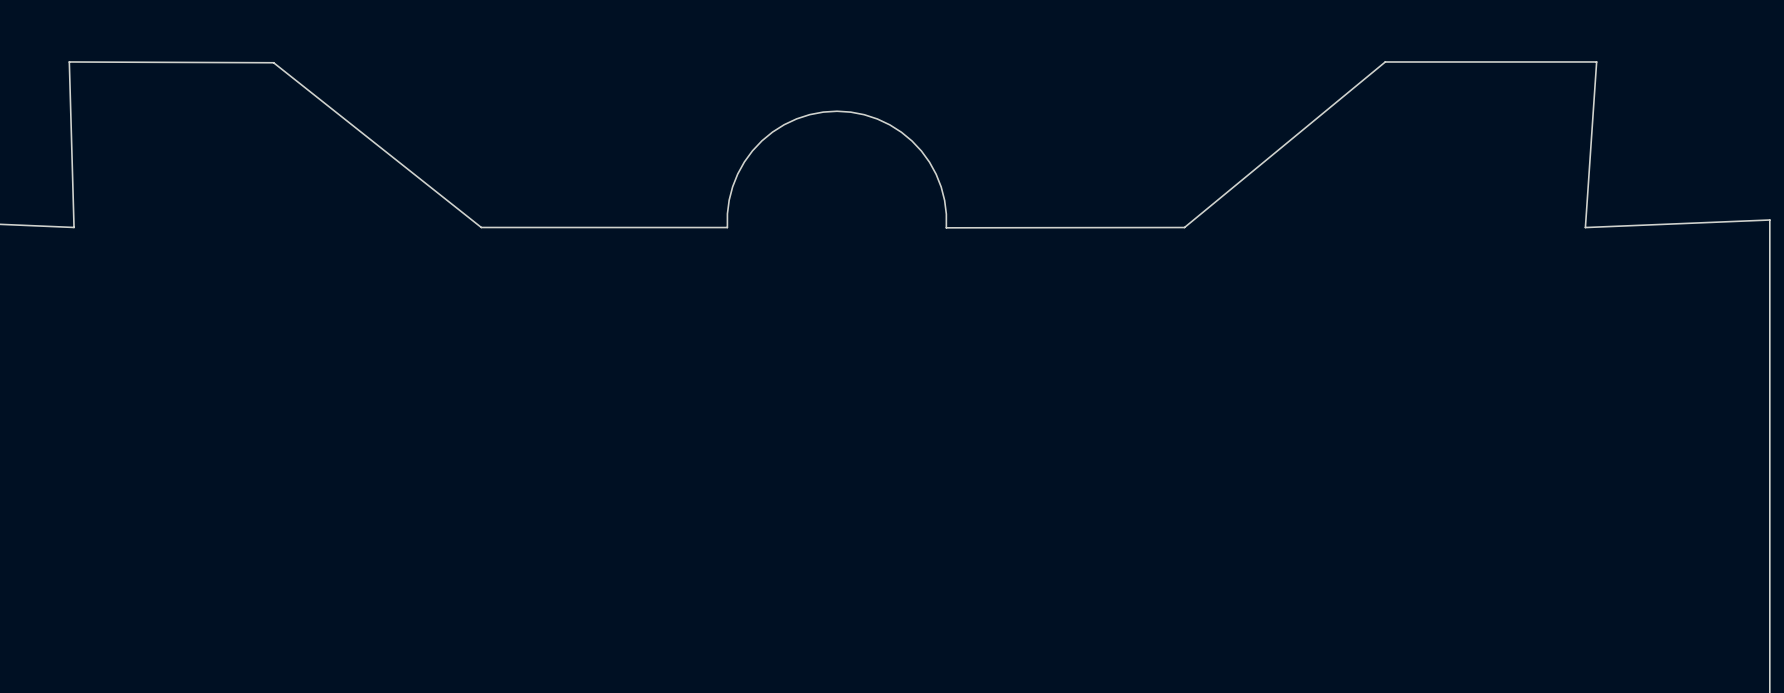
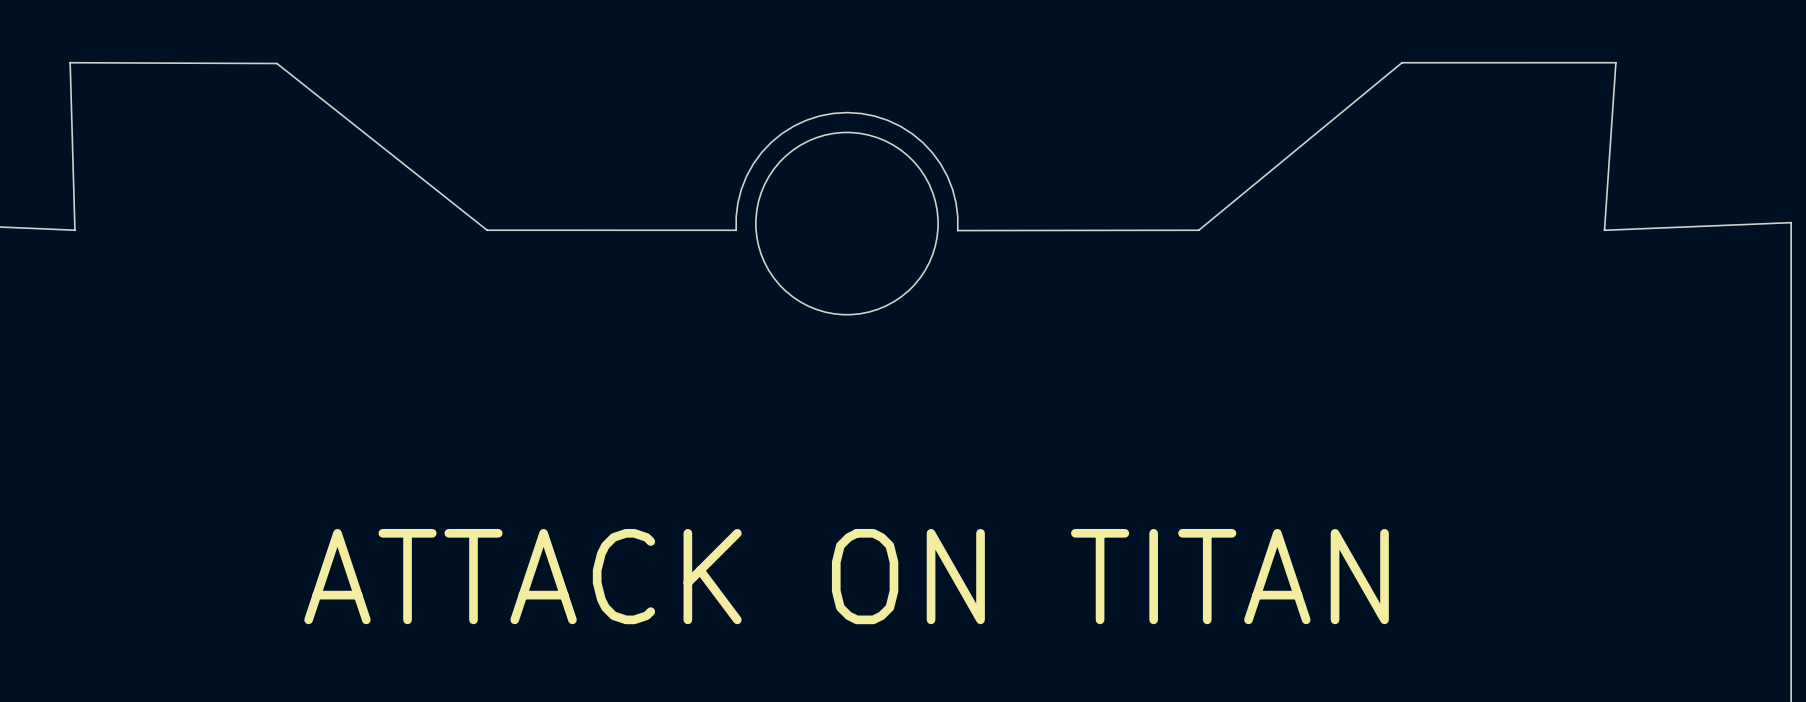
round board edge: none -> [755, 131, 939, 316]
text: none -> ATTACK ON TITAN (846, 576)

